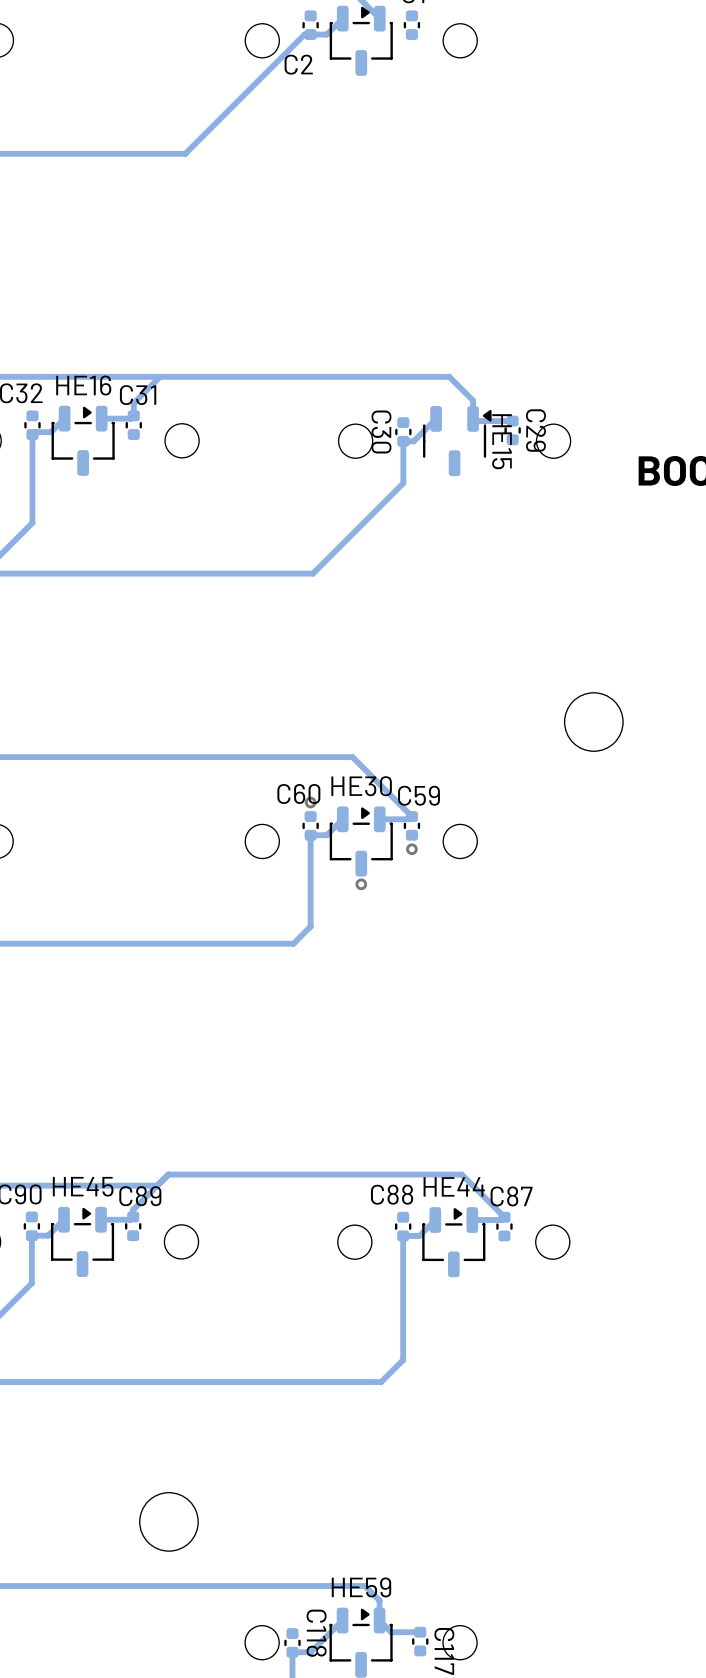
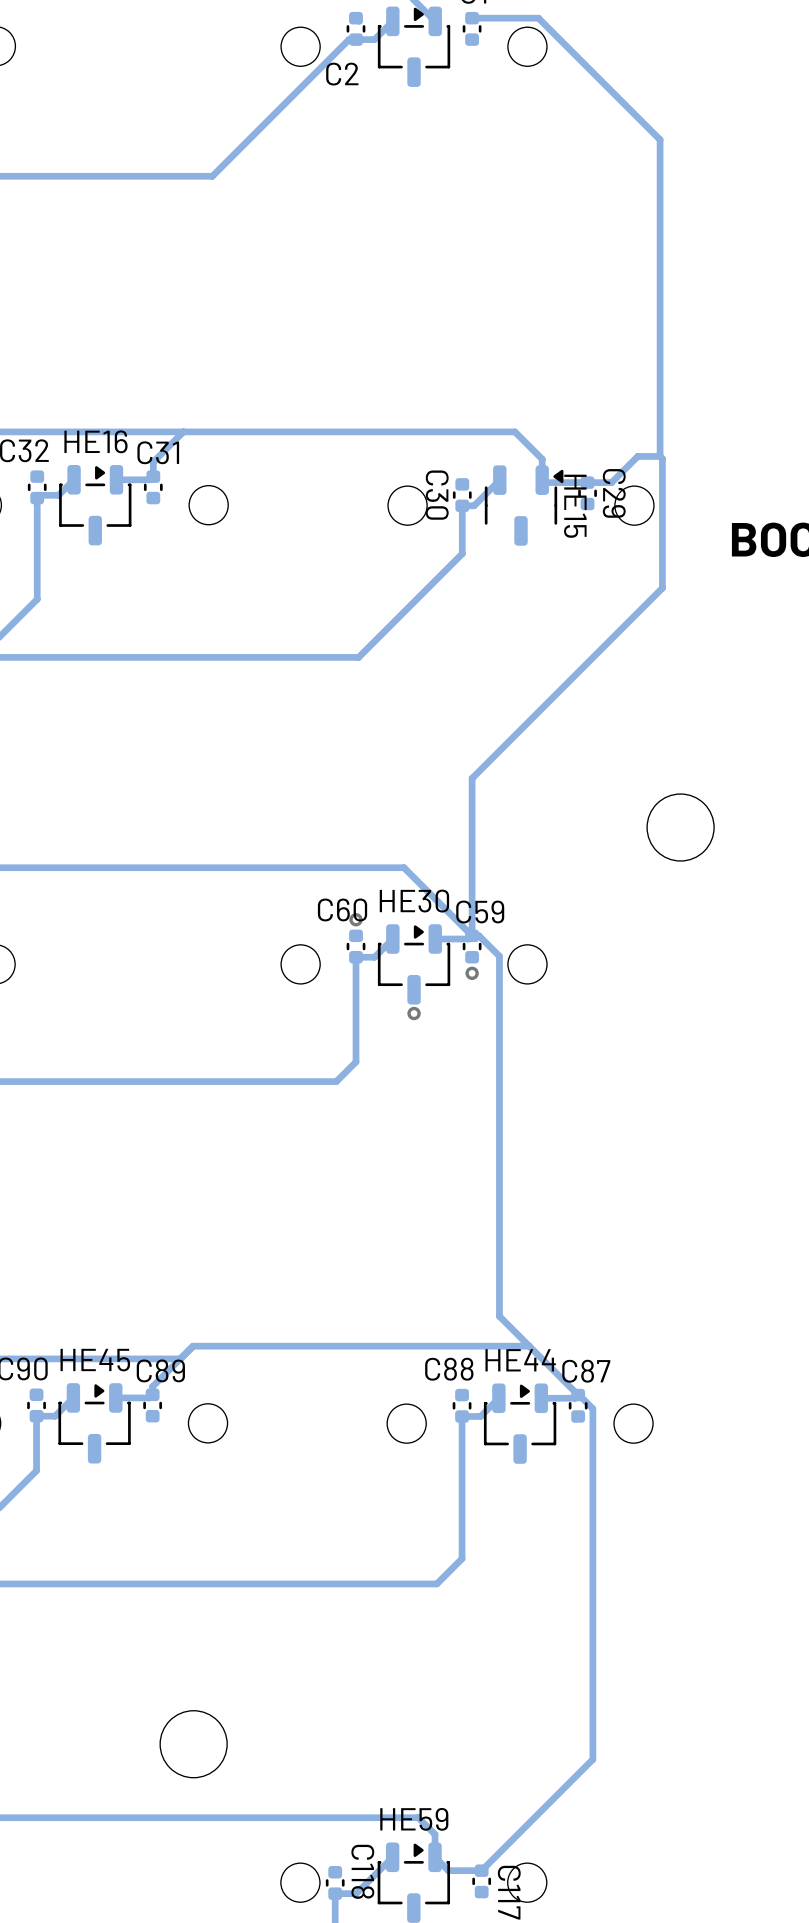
bottom track: none -> (472, 18) (538, 18) (660, 139) (660, 456)
bottom track: none -> (660, 456) (637, 456) (611, 482) (587, 482)
bottom track: none -> (660, 456) (662, 458) (662, 588) (472, 778) (472, 935) (479, 935) (499, 956) (499, 1316) (529, 1346)
bottom track: none -> (578, 1395) (592, 1408) (592, 1759) (481, 1870)

